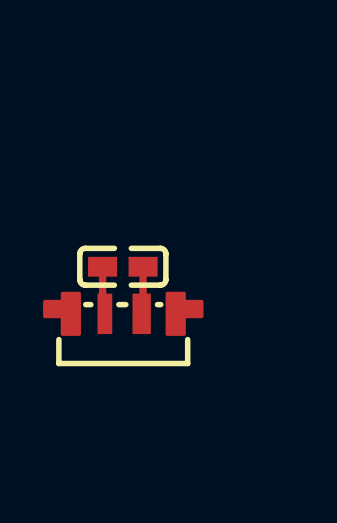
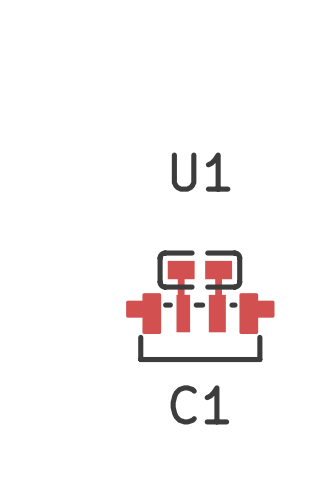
U1 name: none -> U1 (201, 172)
C1 name: none -> C1 (199, 404)

